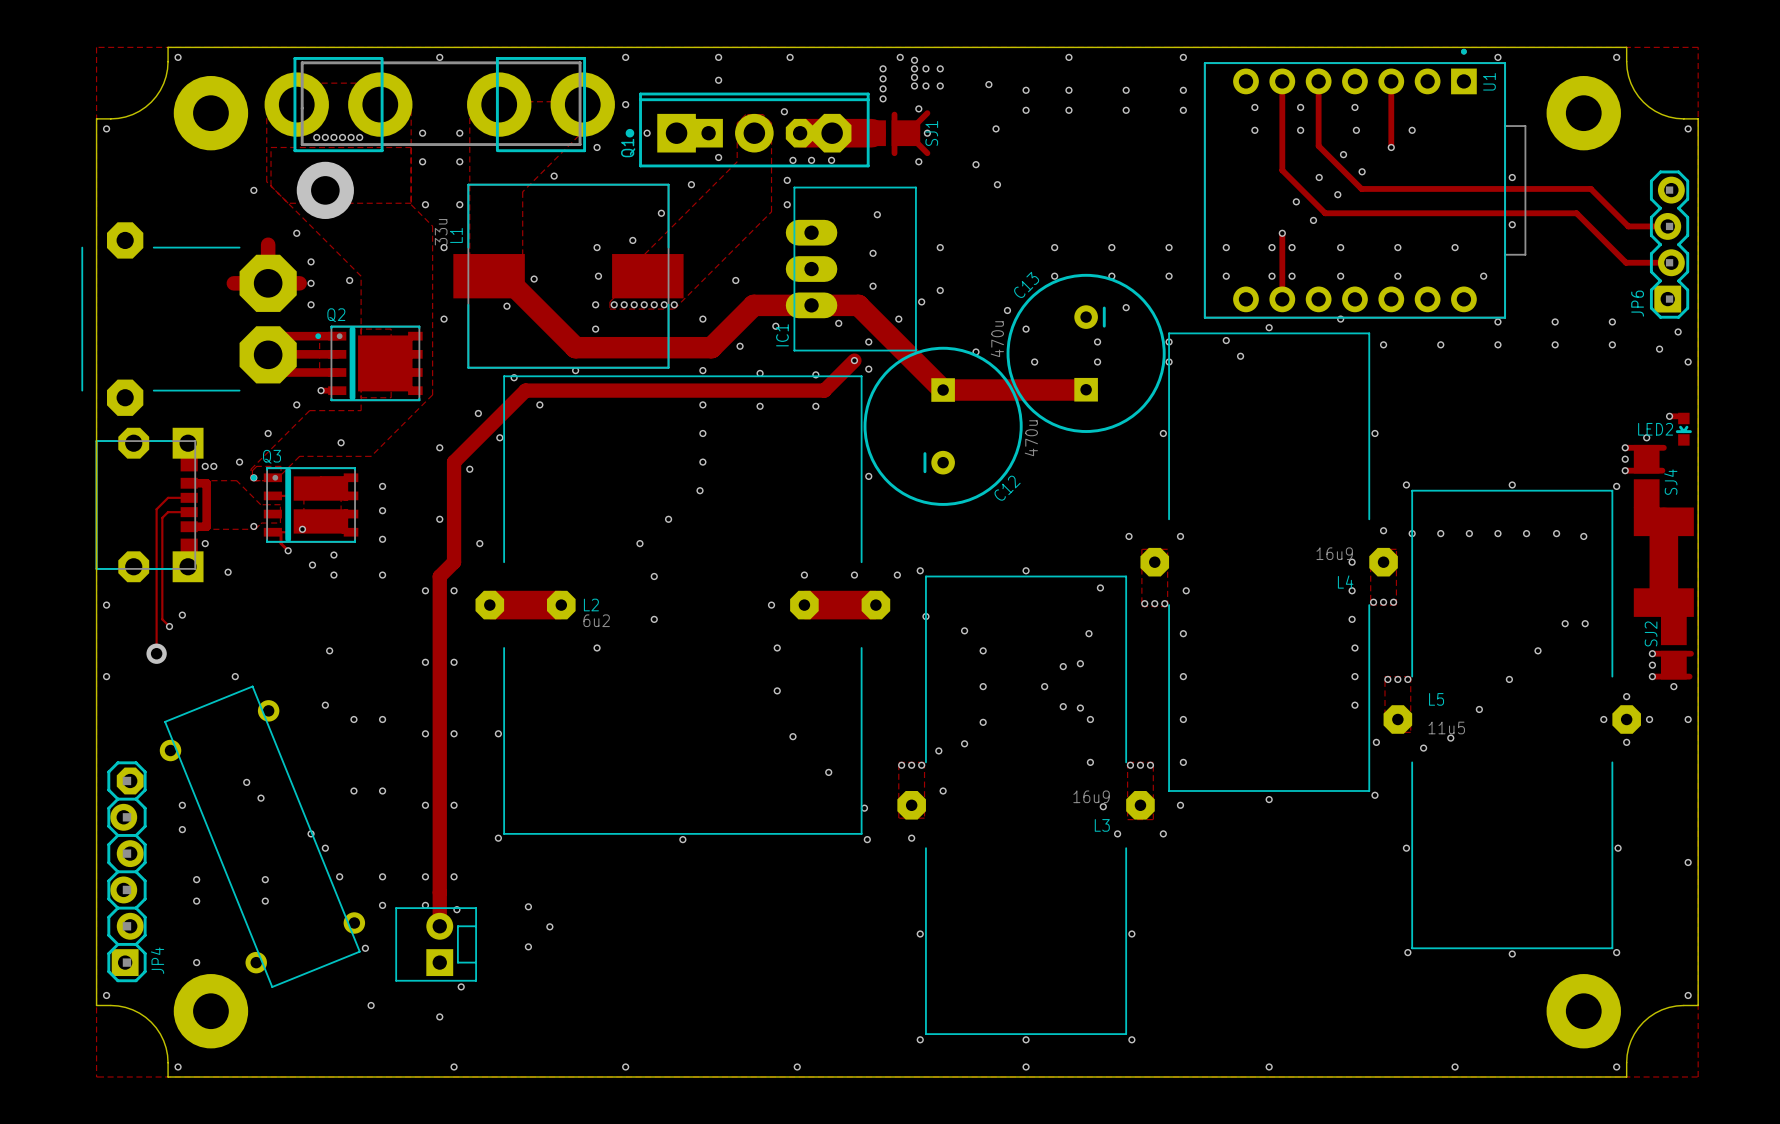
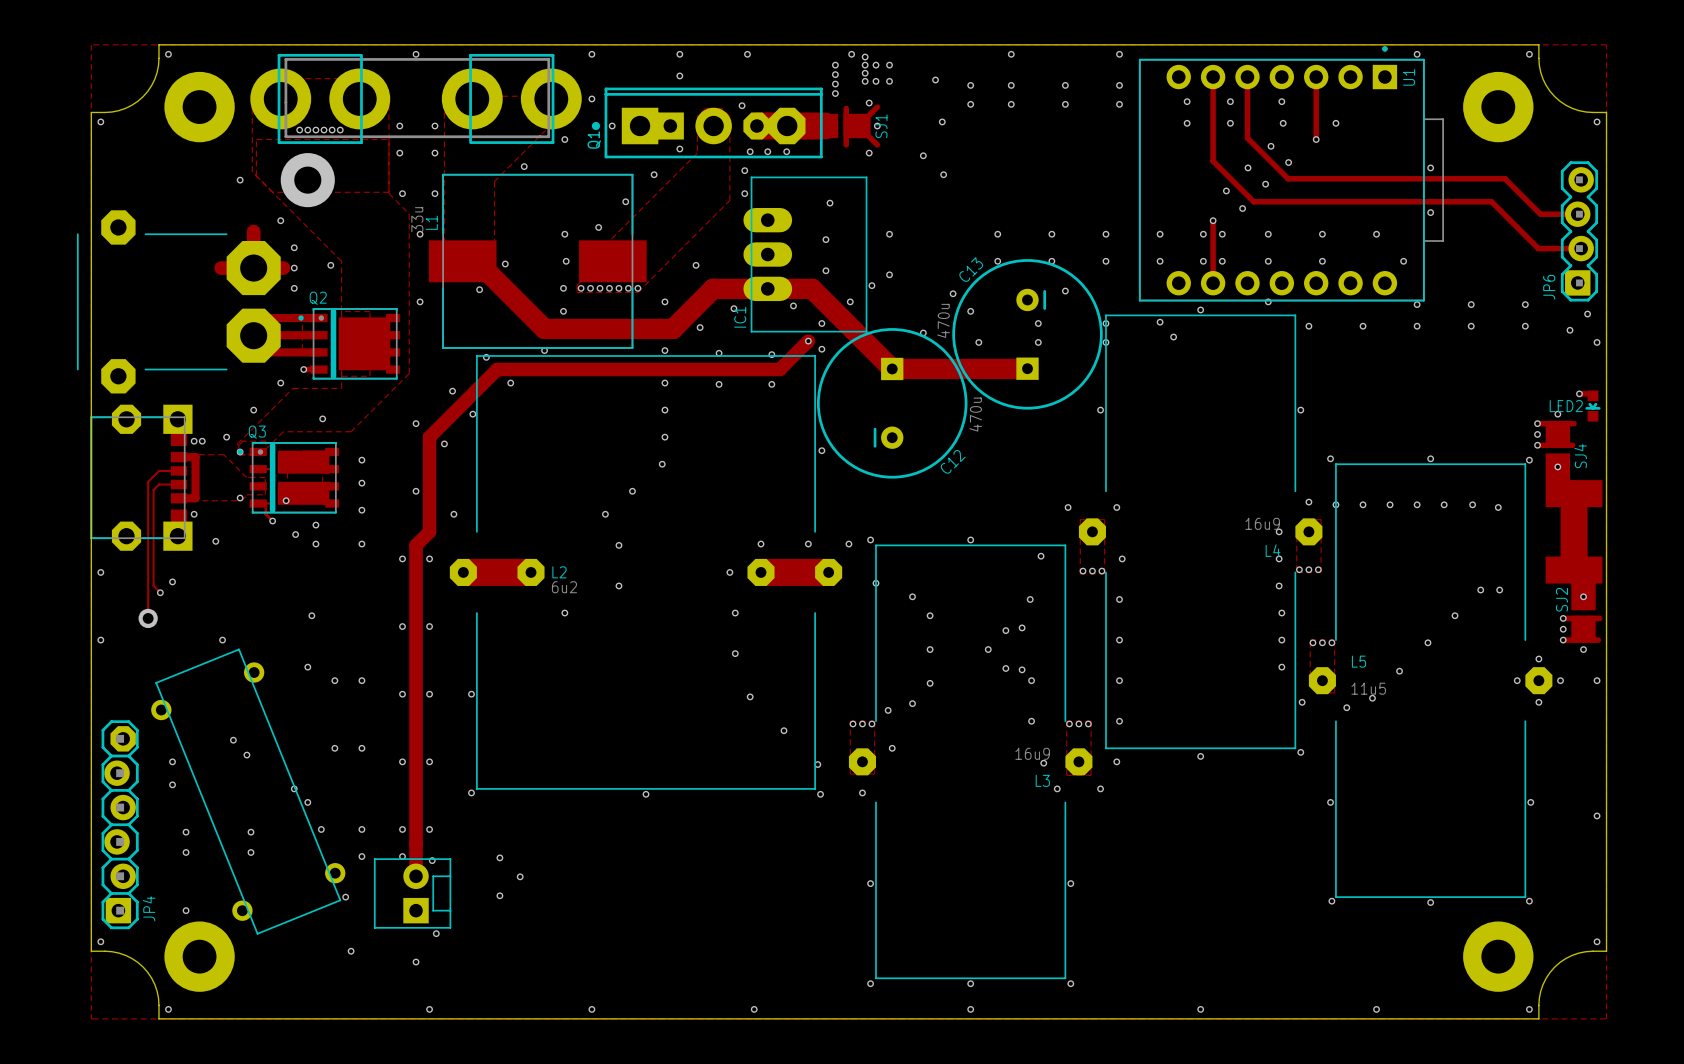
via: none -> (1557, 466)
via: none -> (1583, 596)

